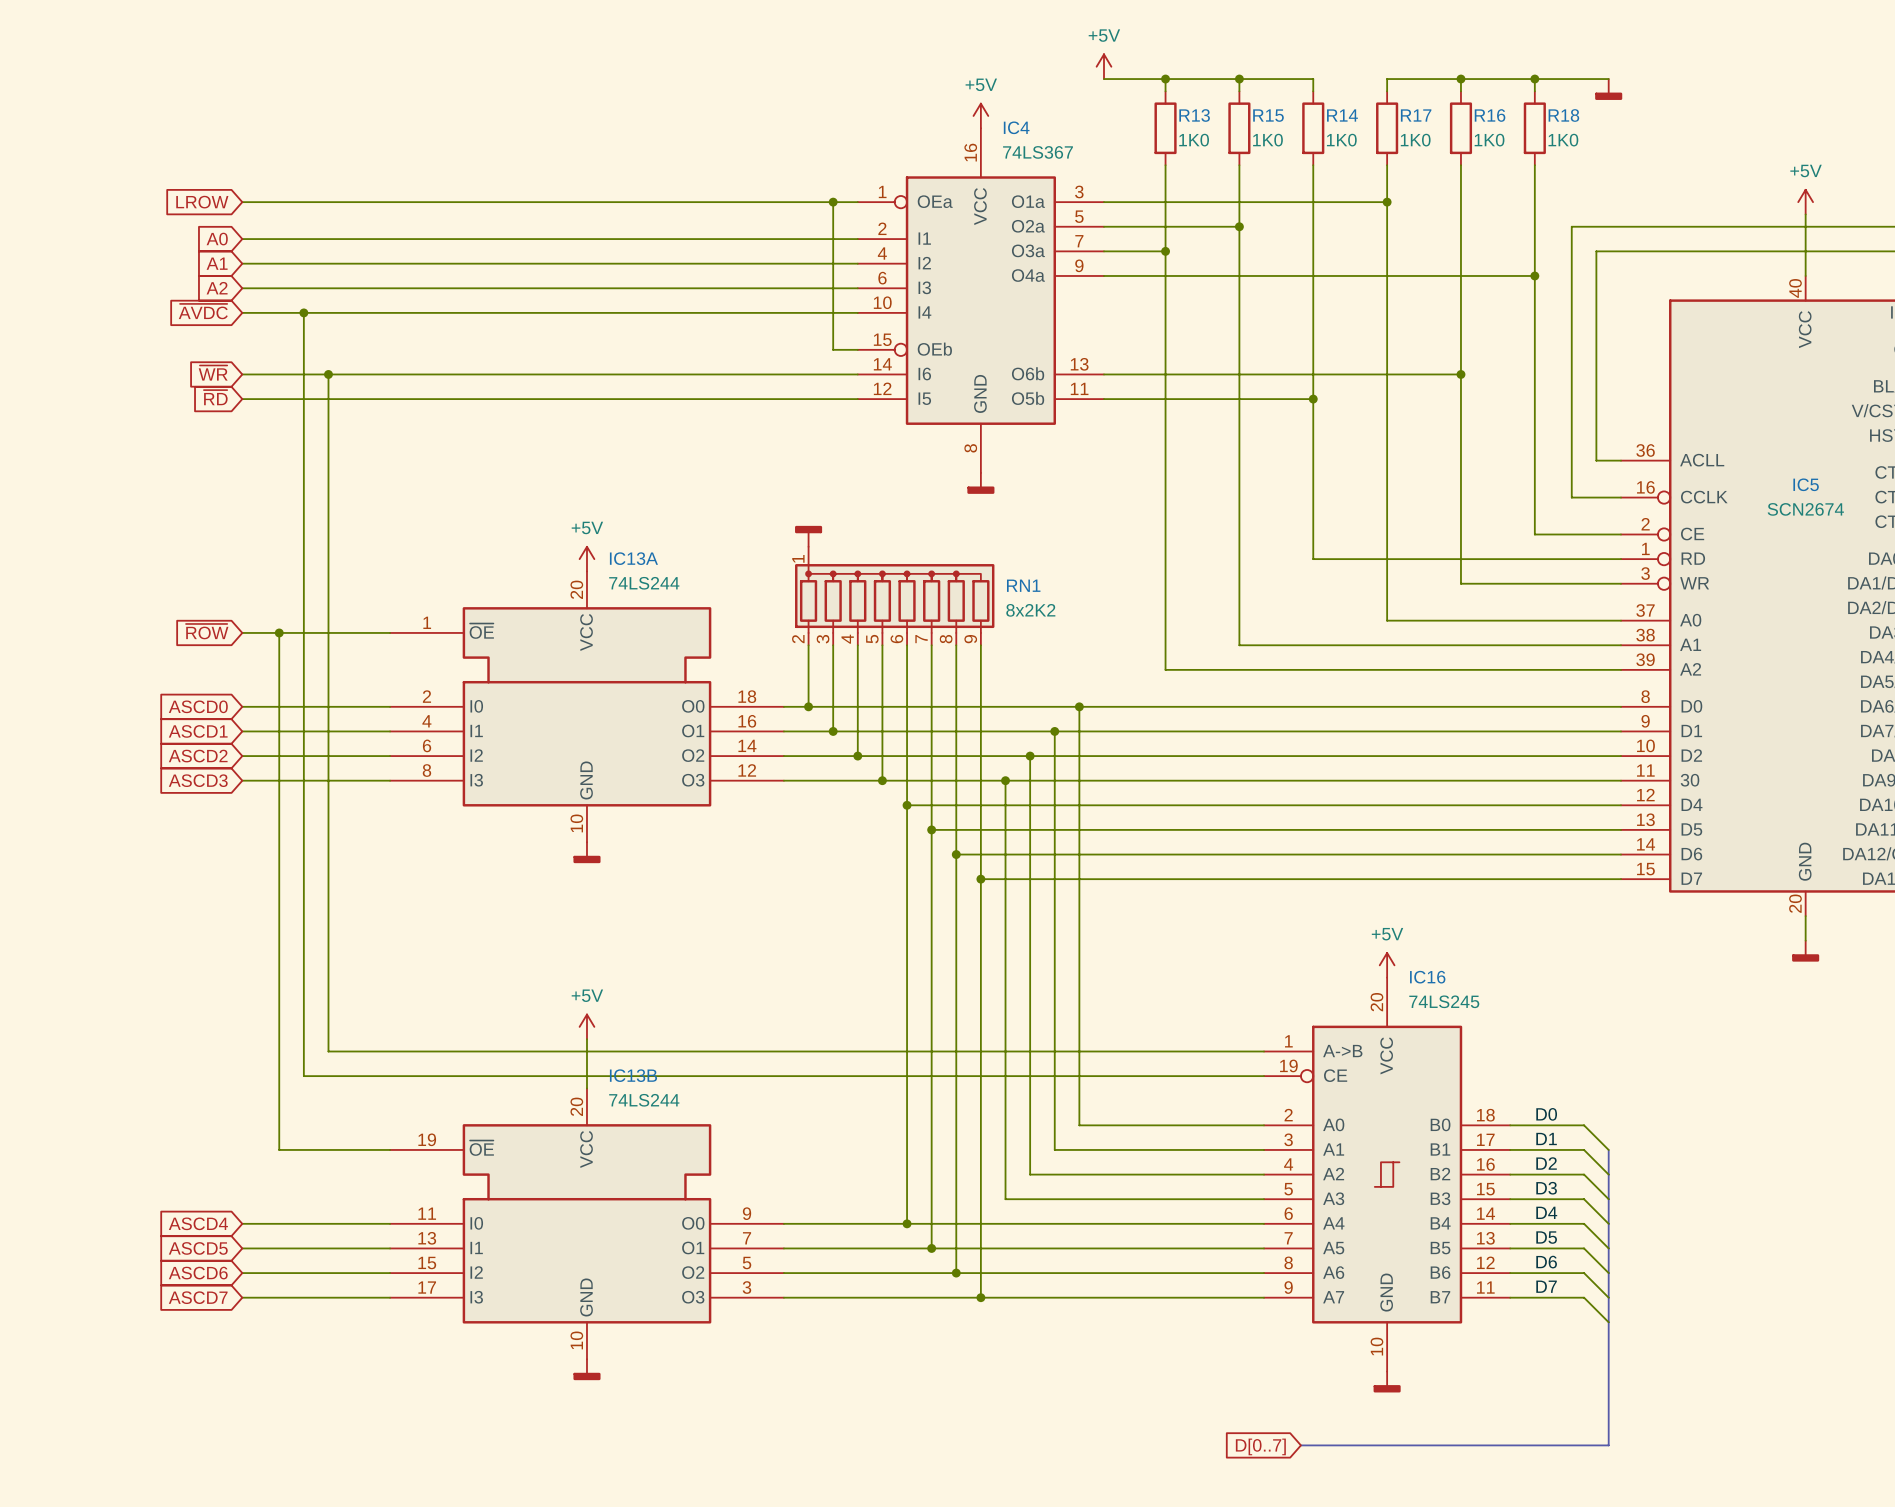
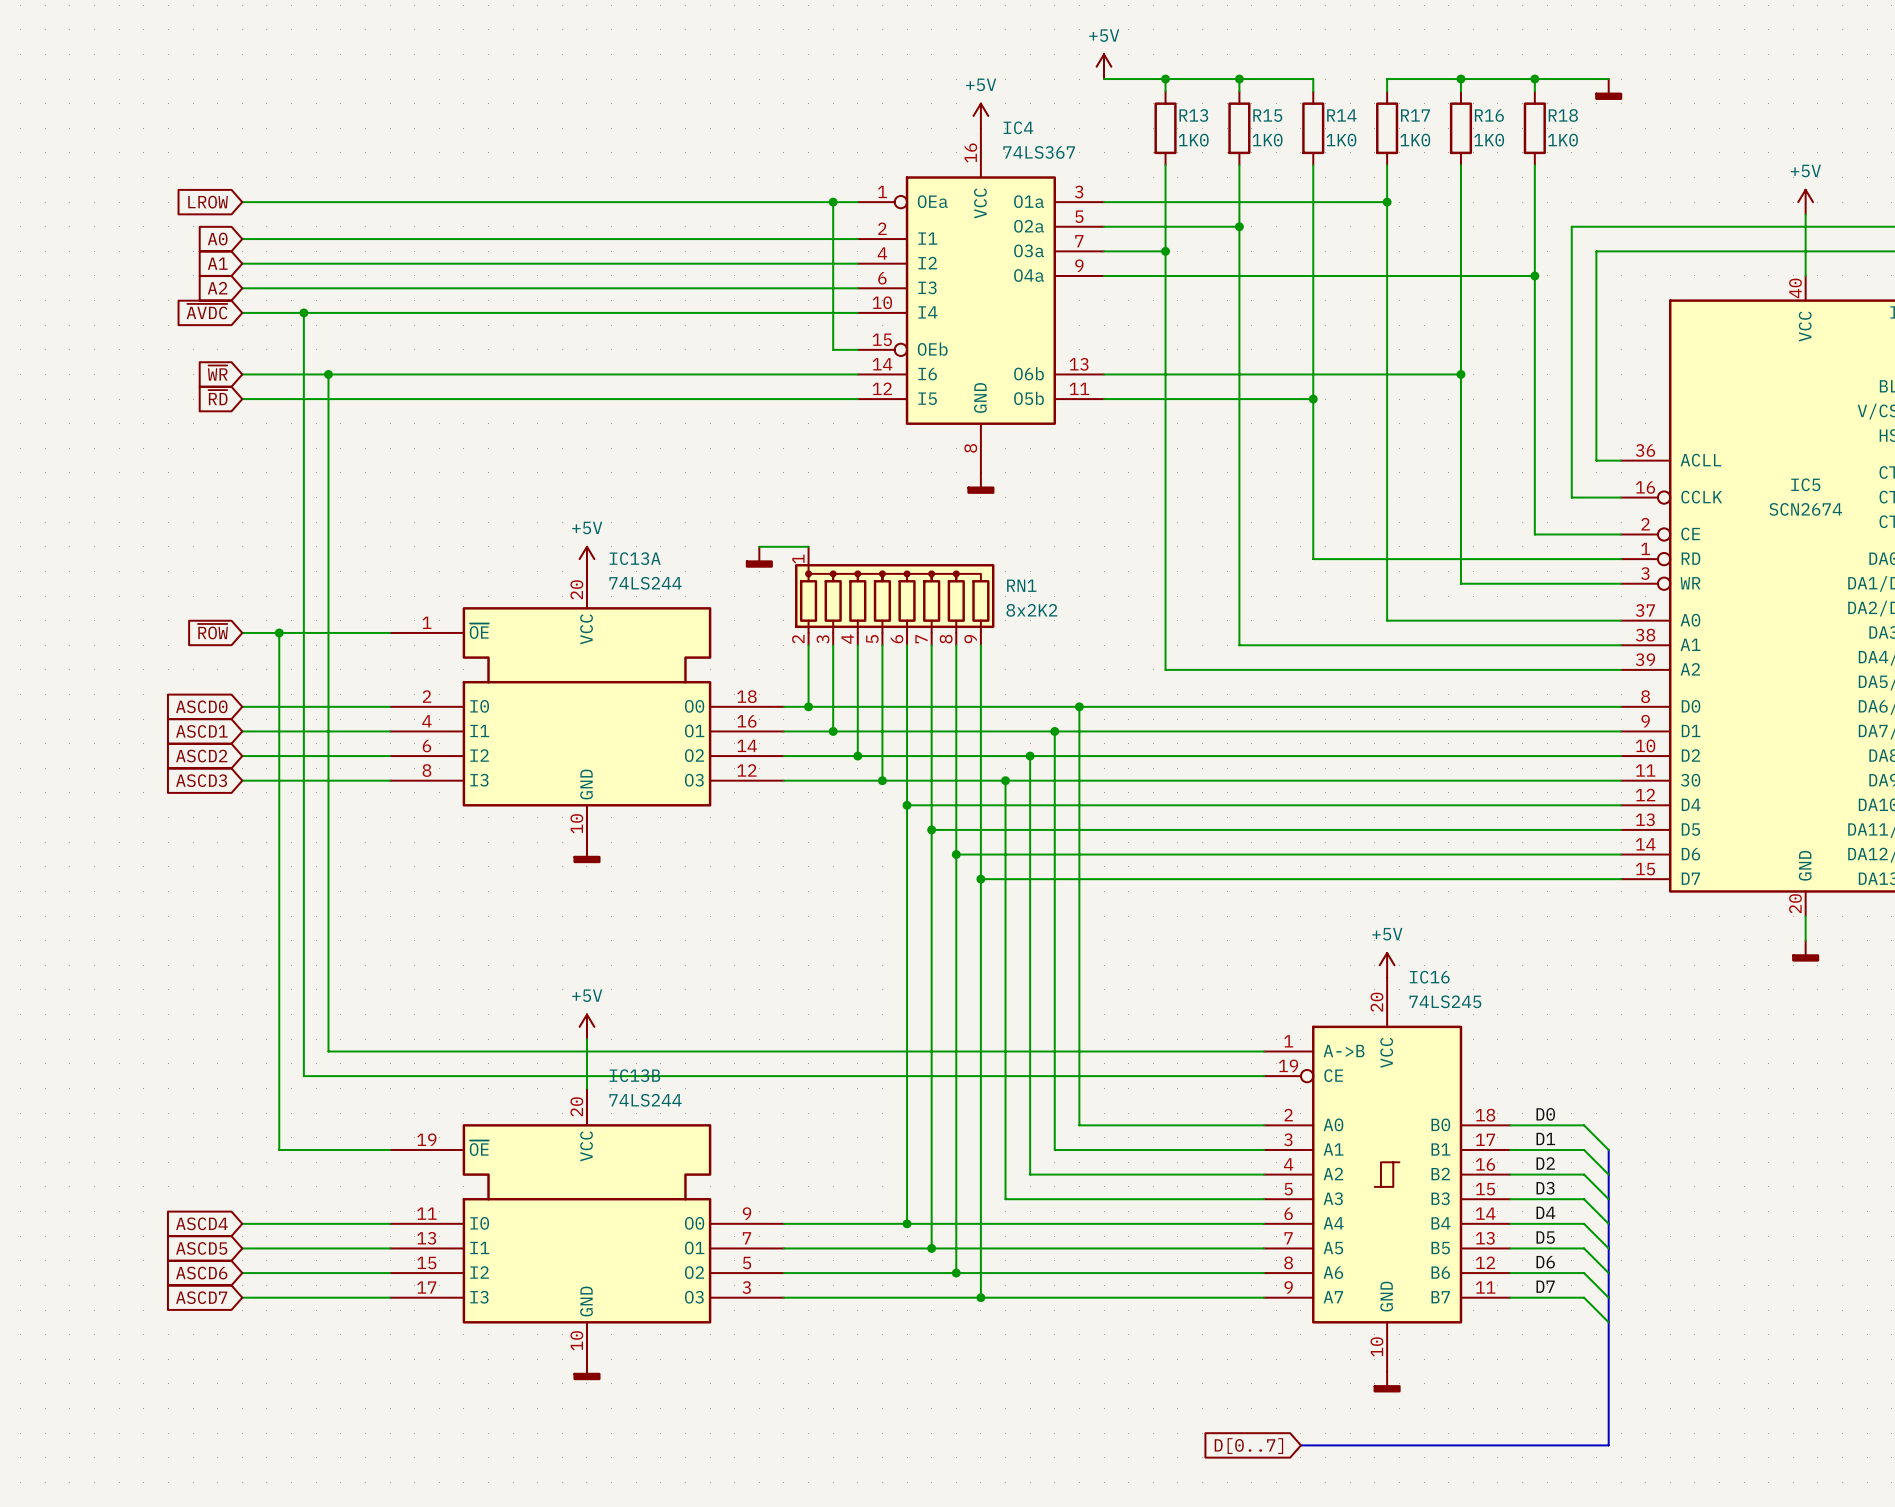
power symbol rotation: 0° (808, 536) -> 180° (759, 557)
power symbol position: (808, 536) -> (759, 557)
wire: none -> (759, 546) (808, 546)

